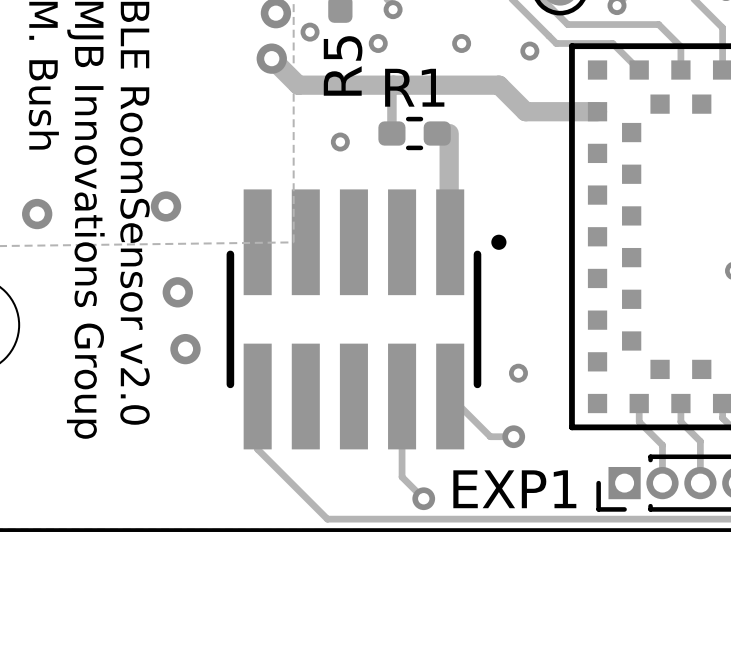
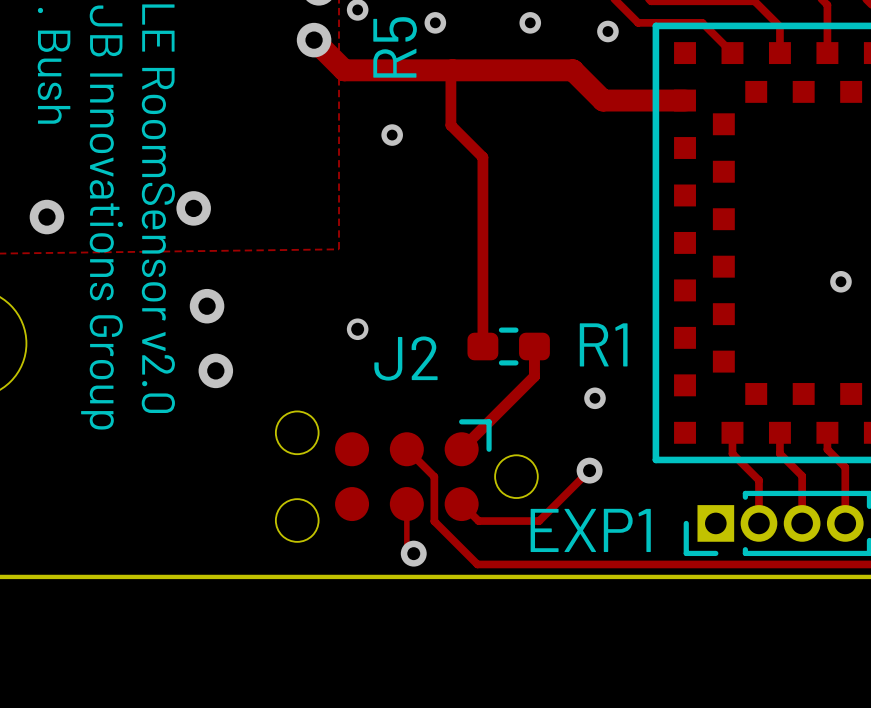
R1 name position: R1 (414, 87) -> R1 (603, 344)
track: none -> (450, 125) (482, 157) (482, 346)
R1 position: (414, 133) -> (508, 346)
track: (449, 133) (450, 242) -> none
via: none -> (357, 329)
part: (366, 319) -> none
track: none -> (534, 346) (534, 376) (461, 449)
track: (257, 396) (257, 449) (327, 519) (415, 519) -> (406, 449) (434, 476) (434, 521) (477, 564)
track: (402, 396) (402, 477) (423, 498) -> none
track: (450, 396) (490, 436) (513, 436) -> (461, 504) (478, 521) (539, 521) (589, 470)
J2: none -> (406, 476)
track: none -> (406, 504) (406, 546) (413, 553)
via position: (423, 498) -> (413, 553)

